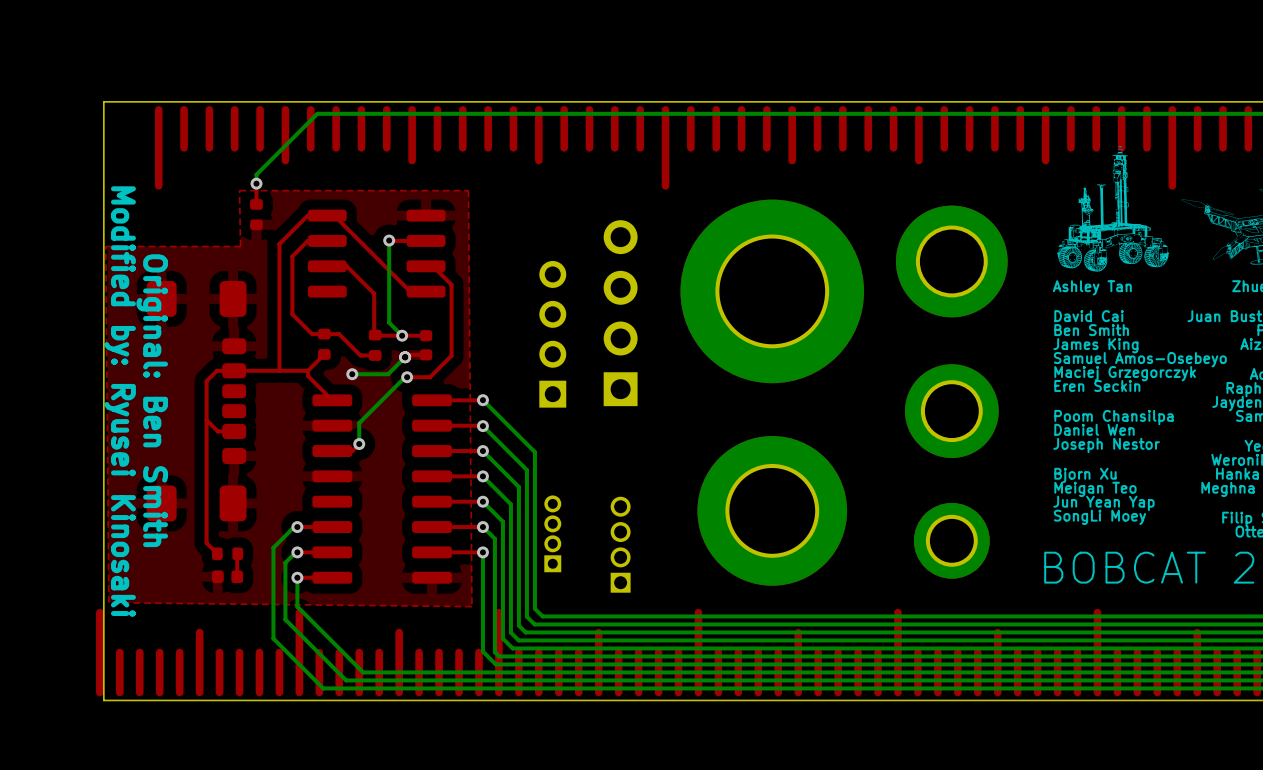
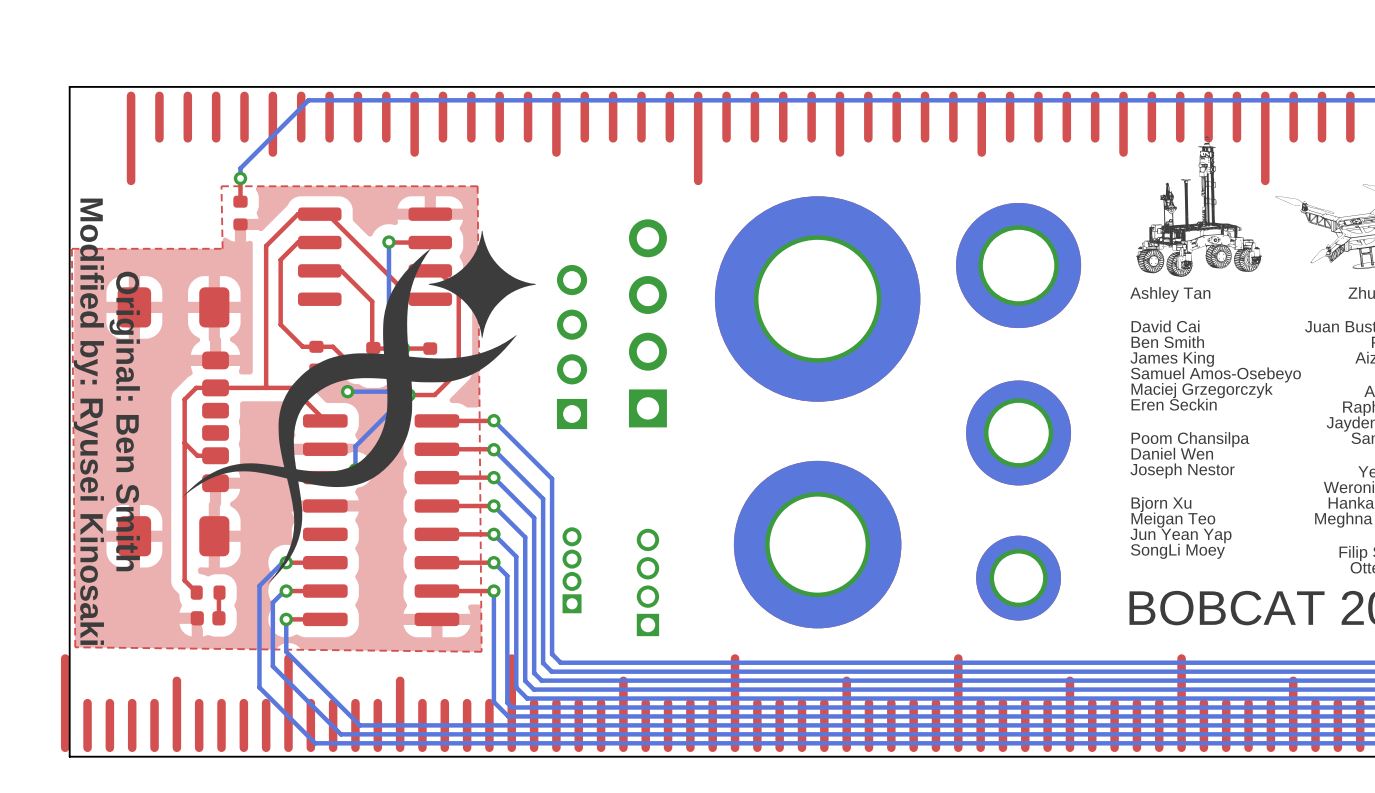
drawing: none -> [182, 230, 537, 584]

